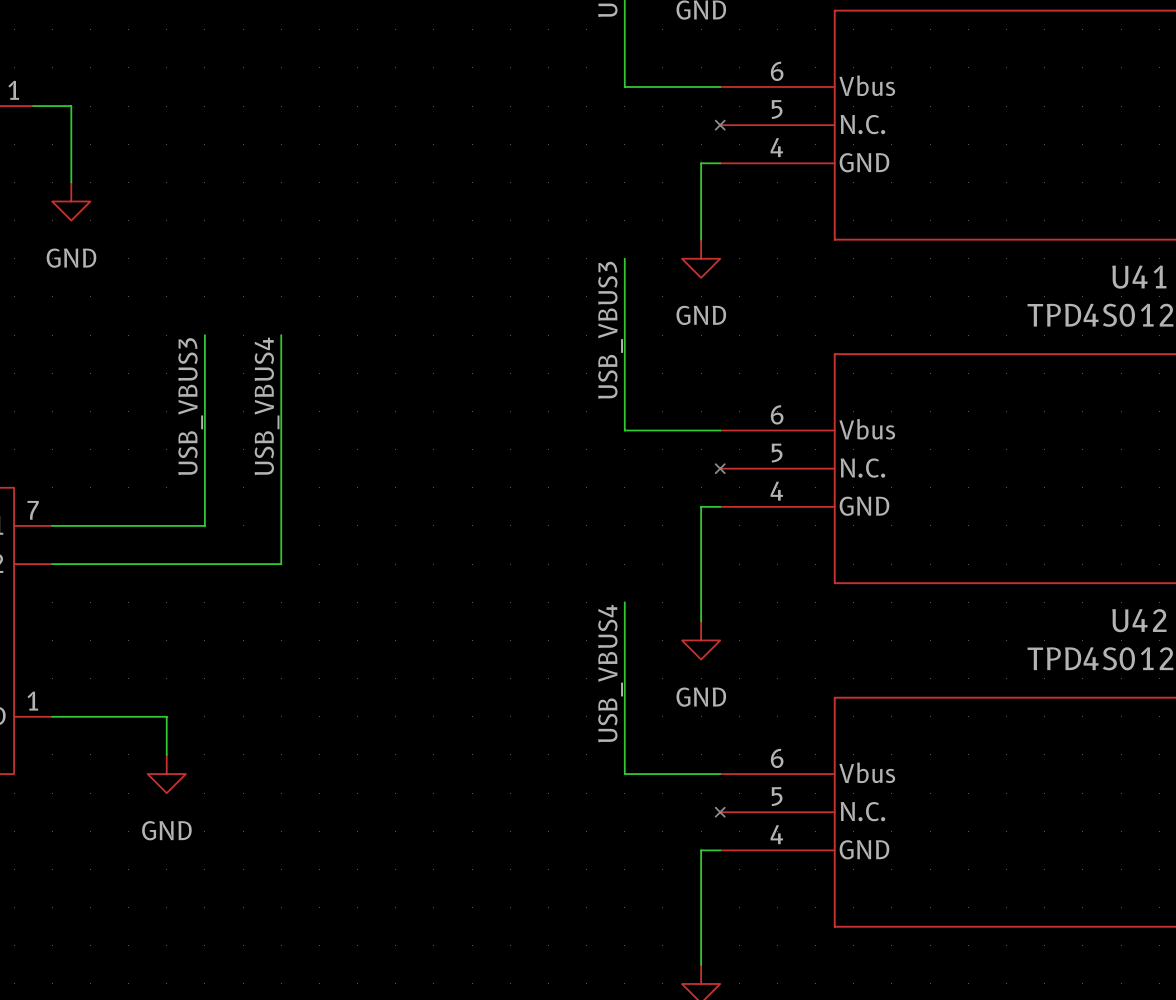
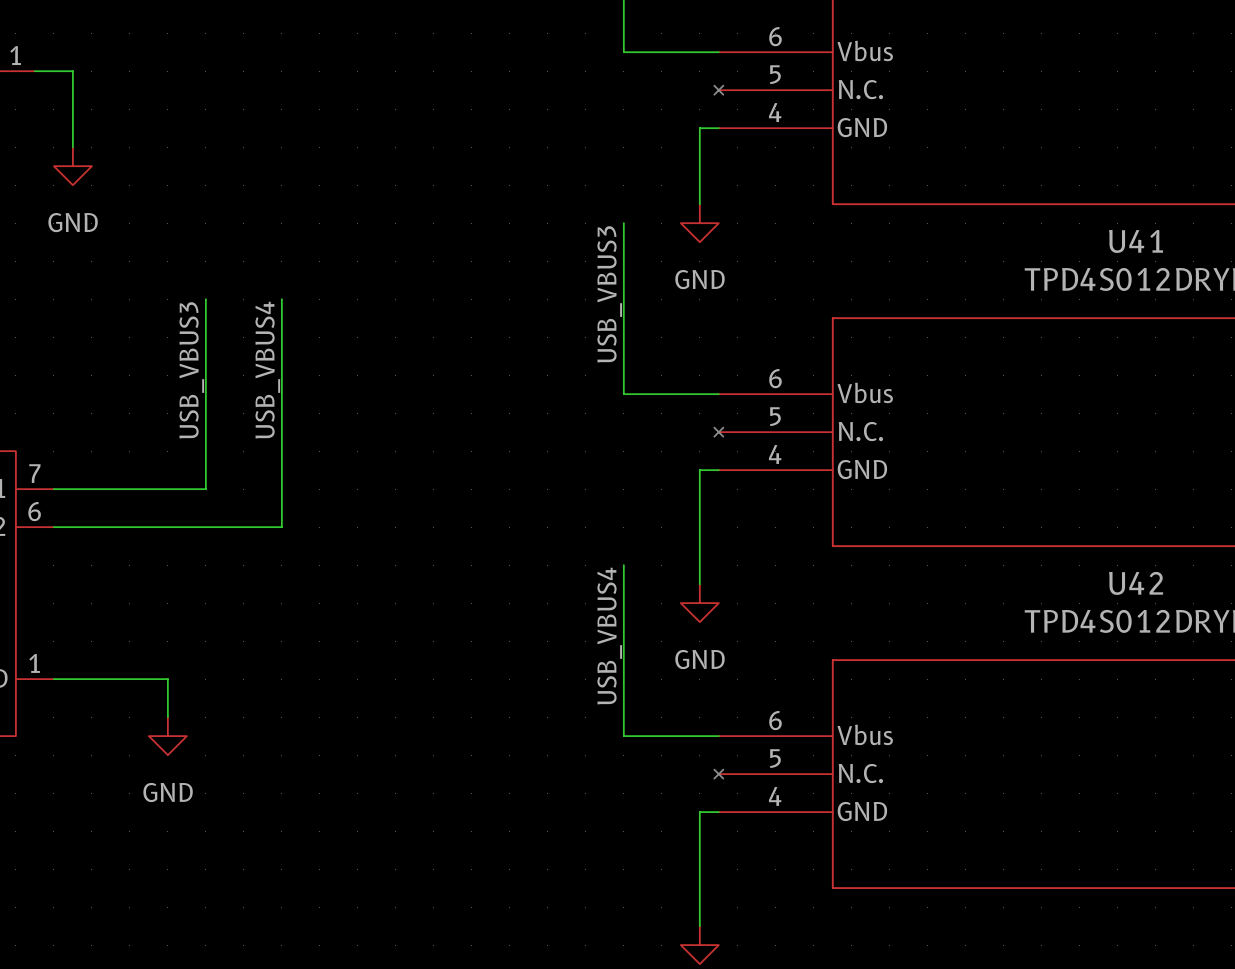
part pin number: none -> 6 (34, 511)

